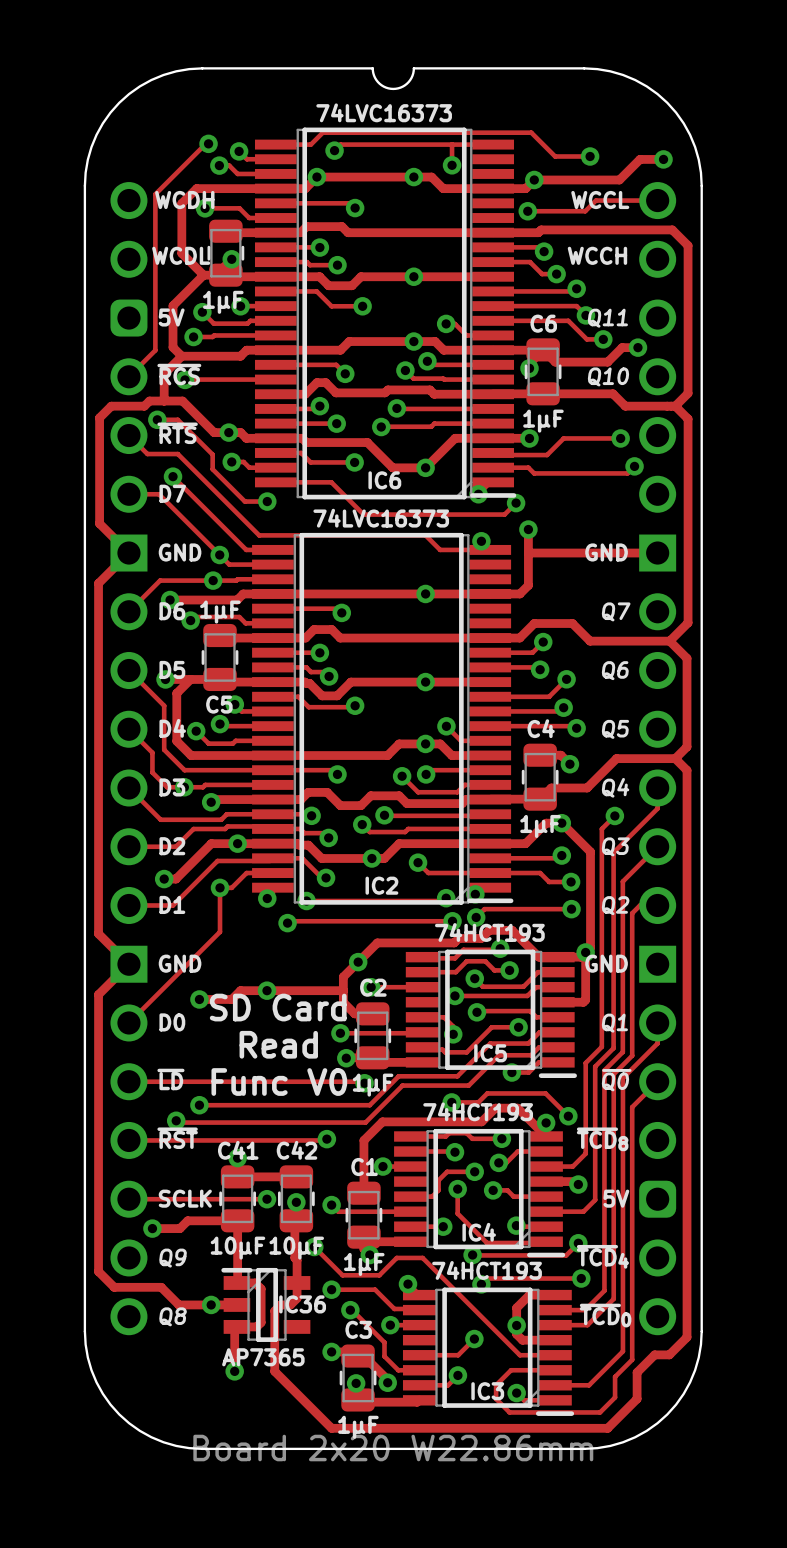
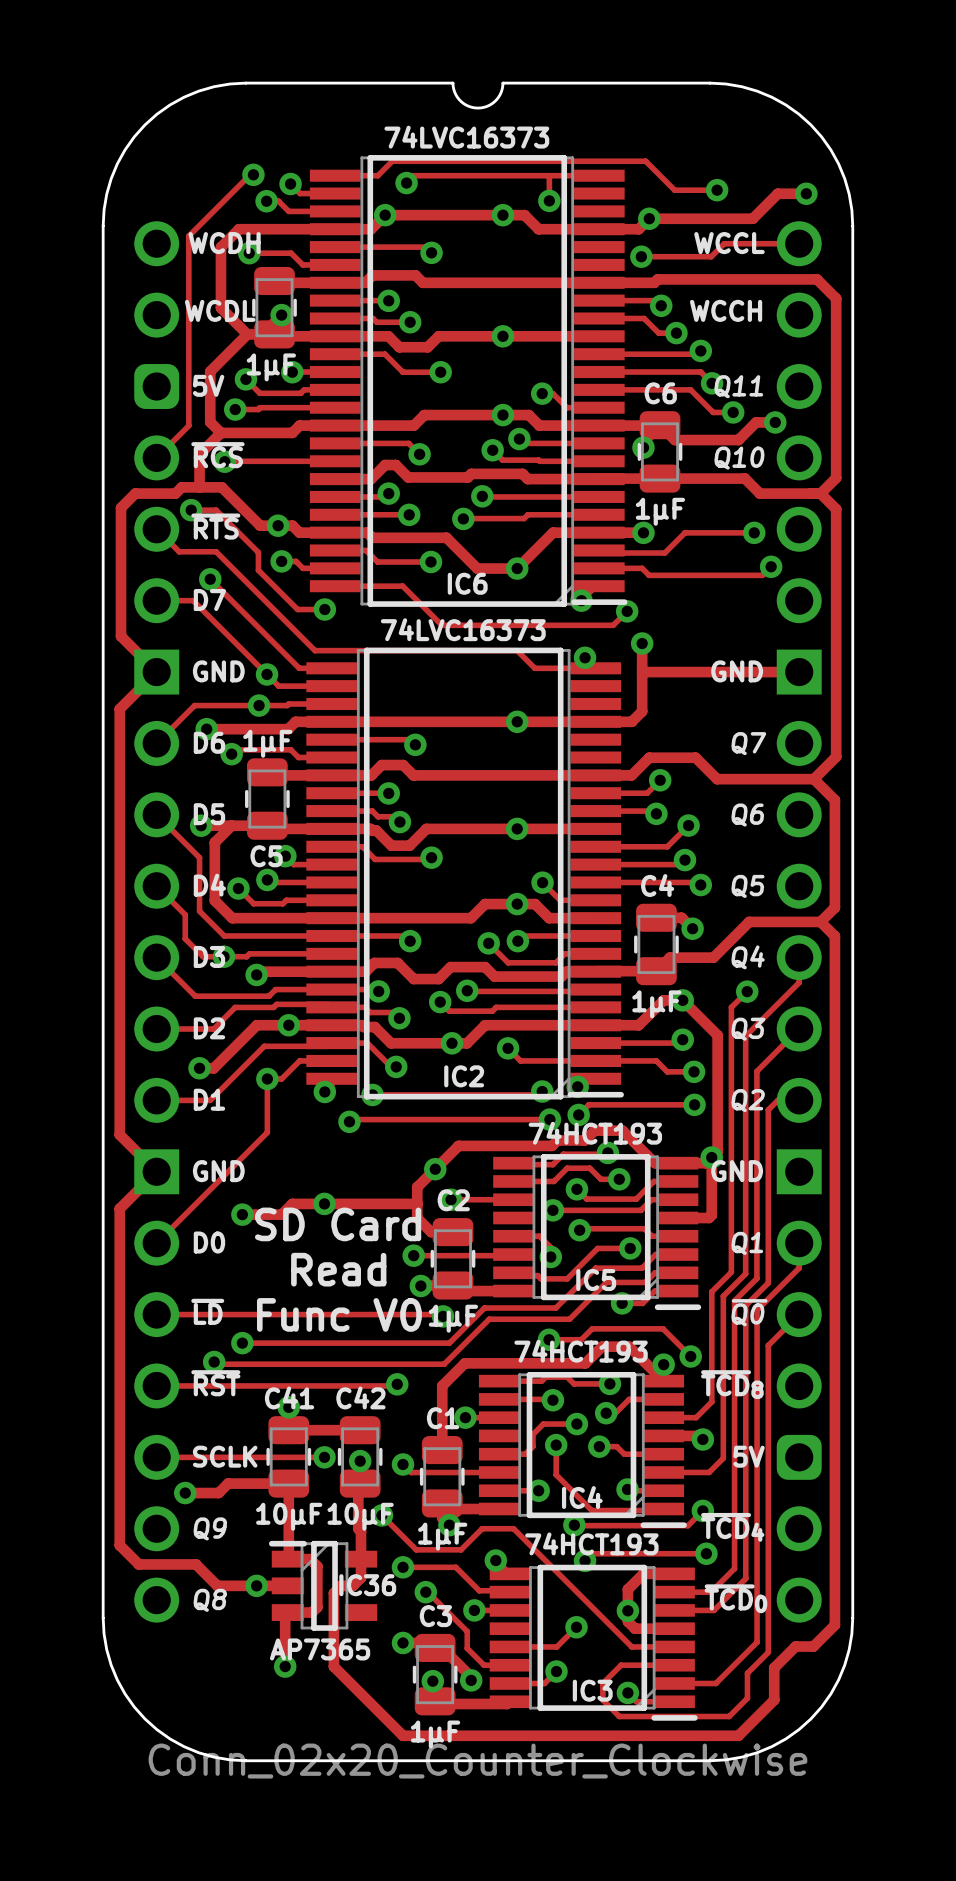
part value: Board 2x20 W22.86mm (393, 1448) -> Conn_02x20_Counter_Clockwise (477, 1761)

